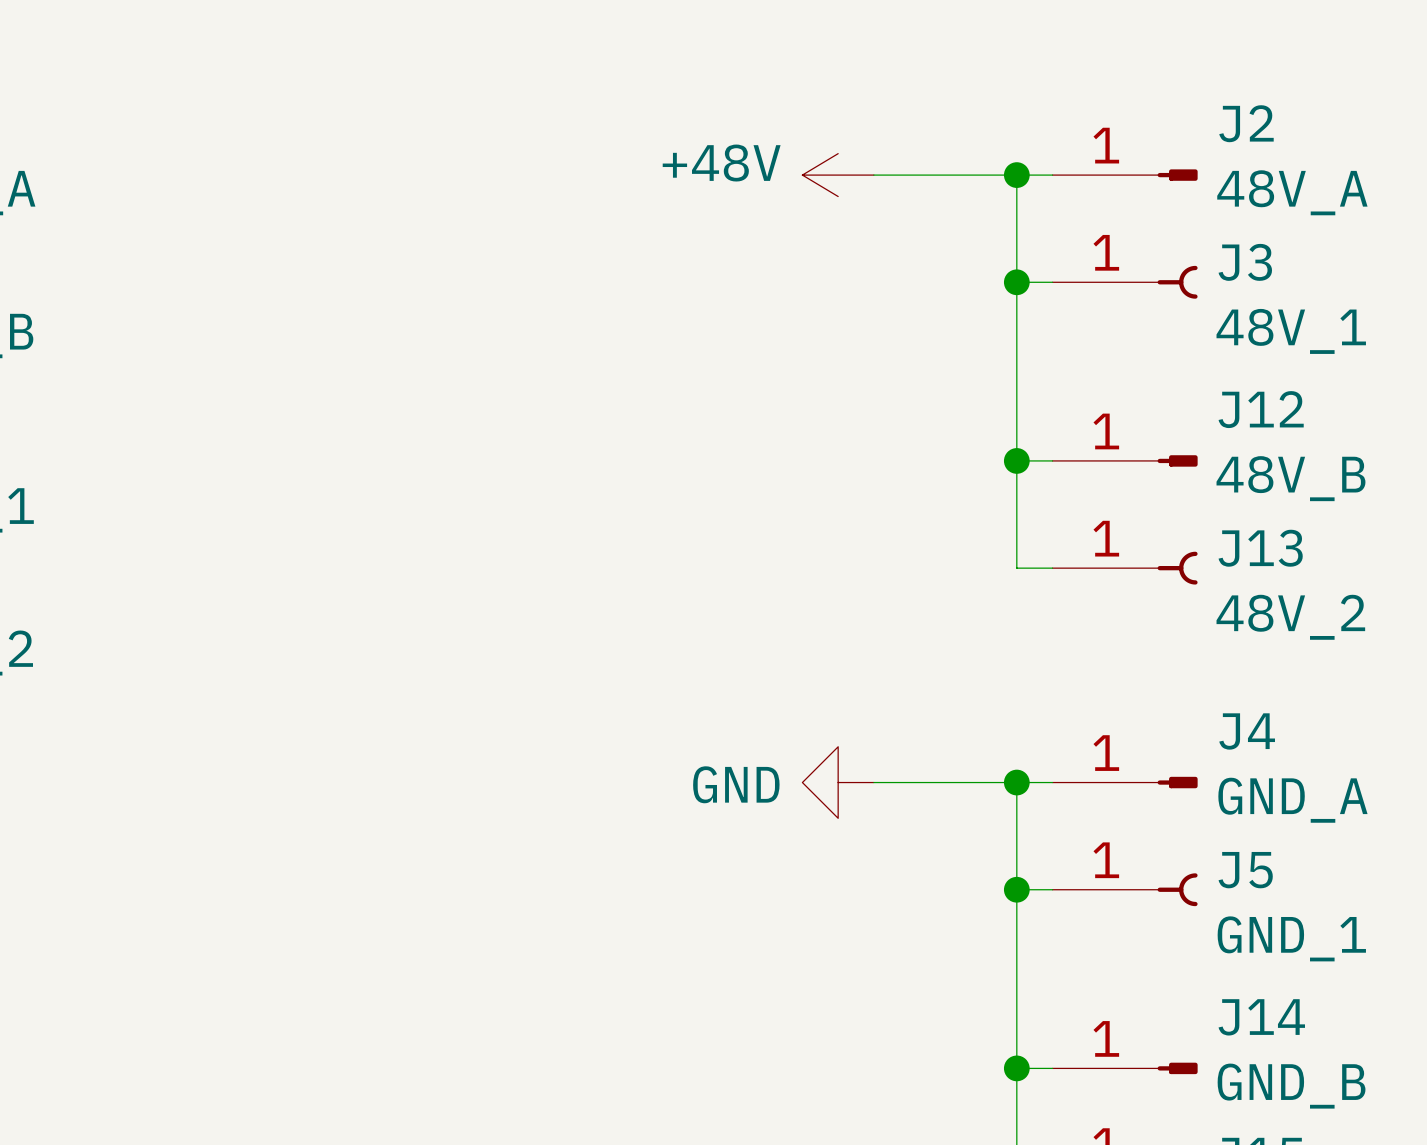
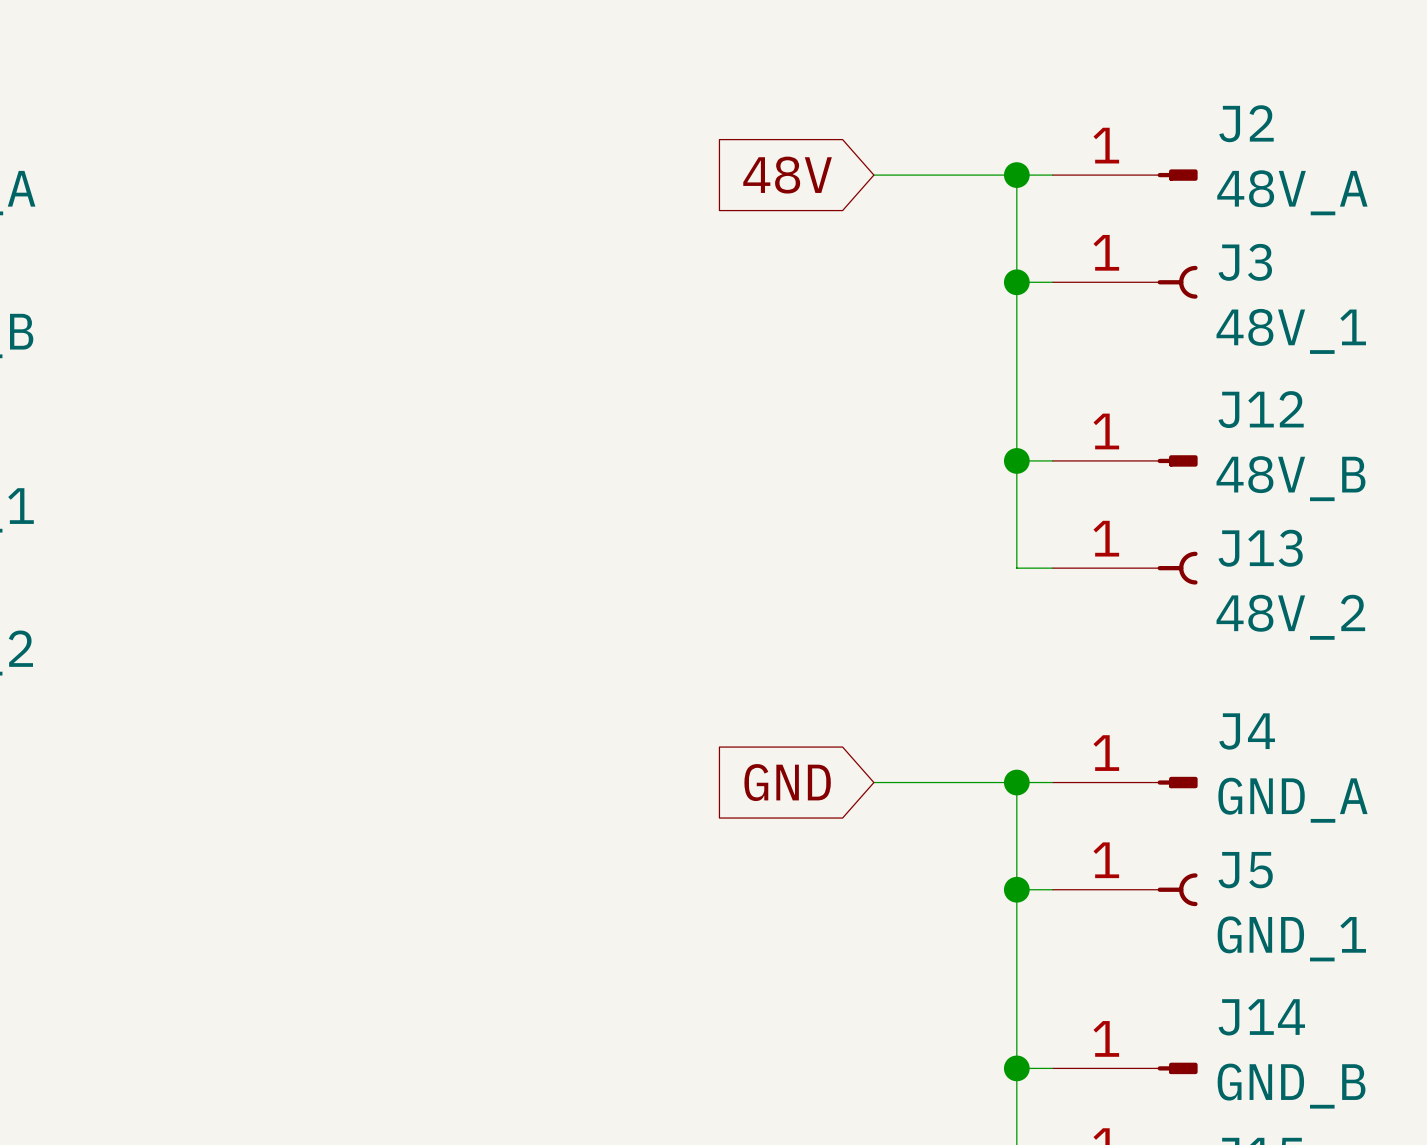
global label: none -> 48V (787, 175)
power symbol: +48V (838, 175) -> none
global label: none -> GND (787, 782)
power symbol: GND (838, 782) -> none

